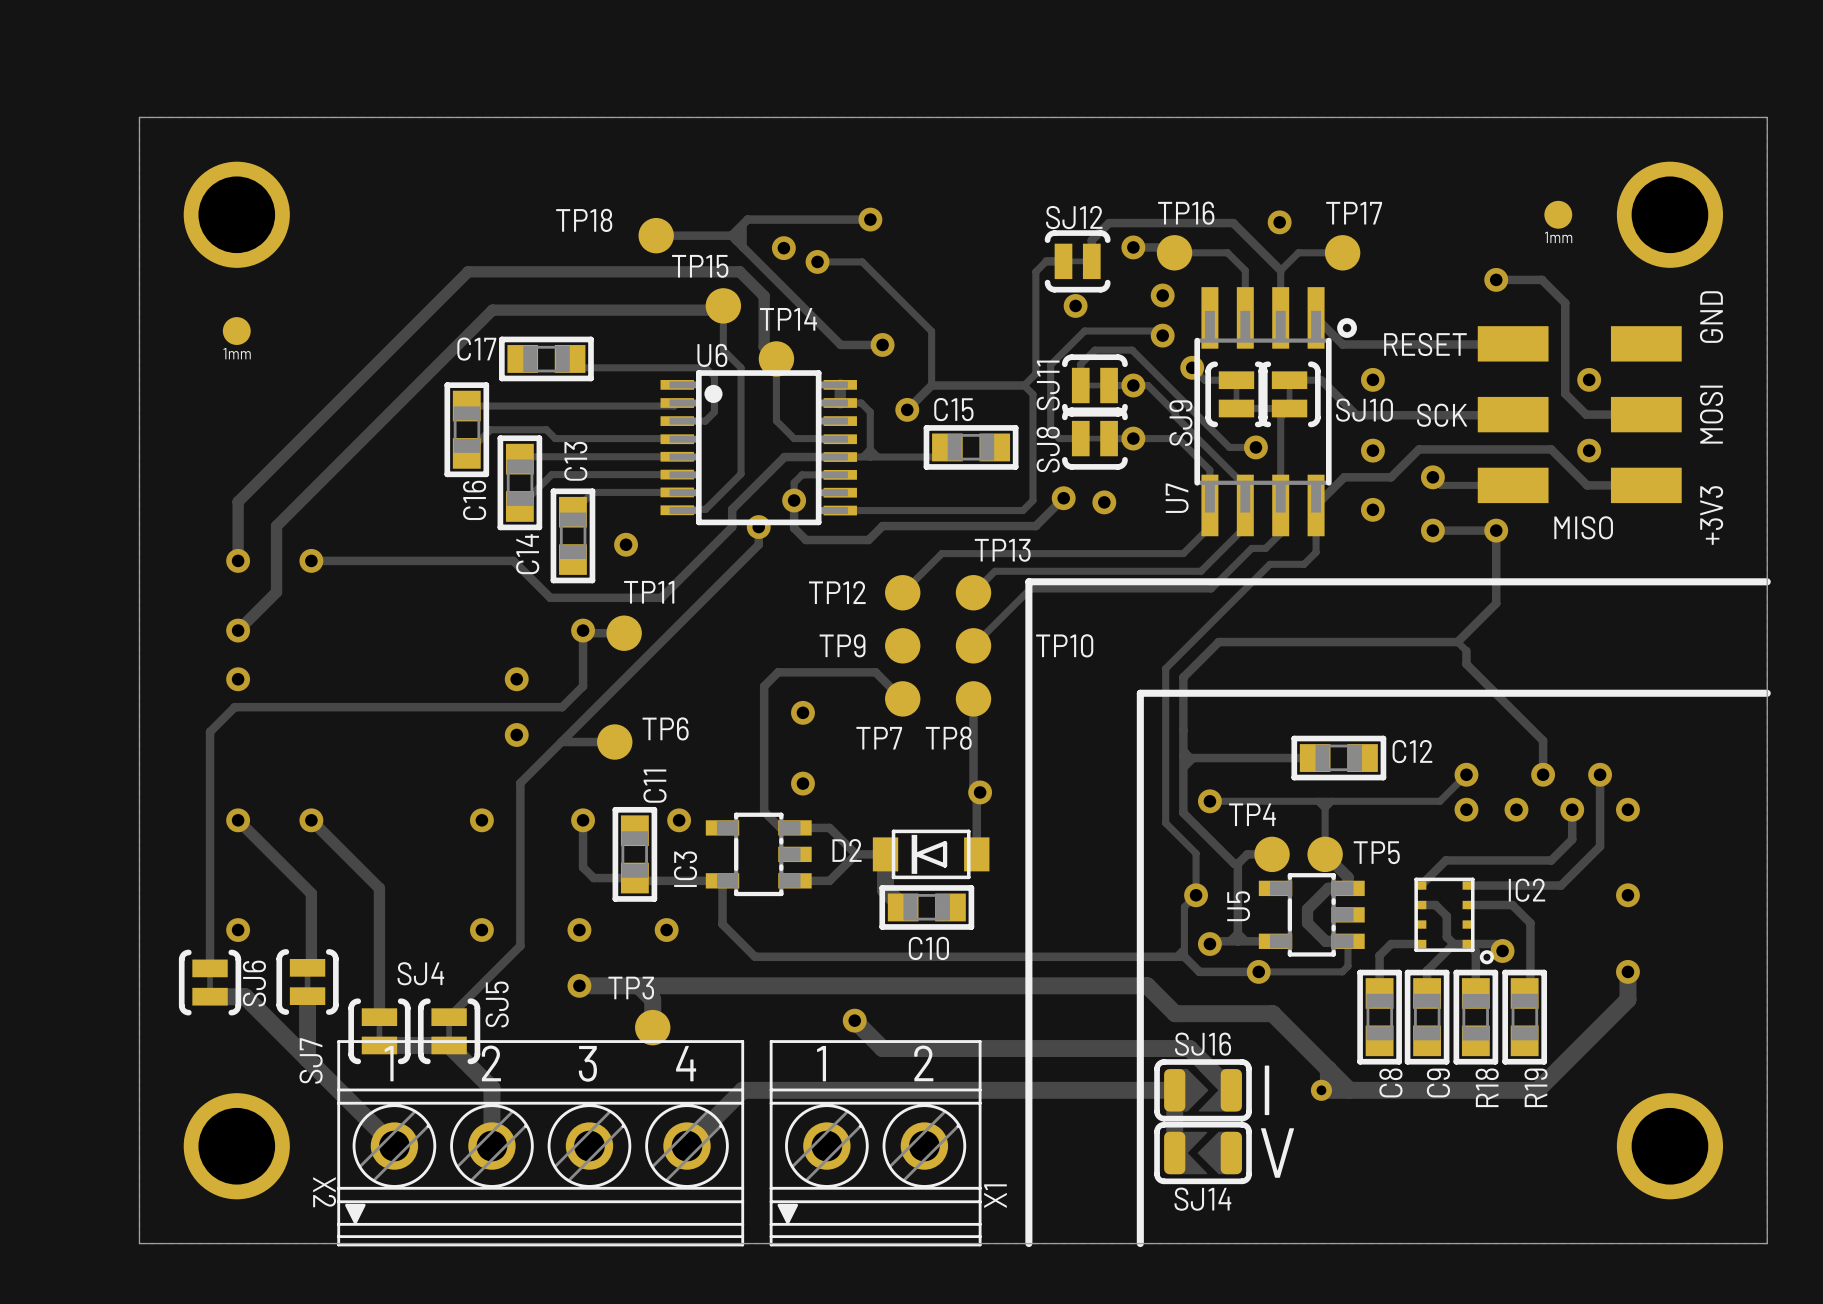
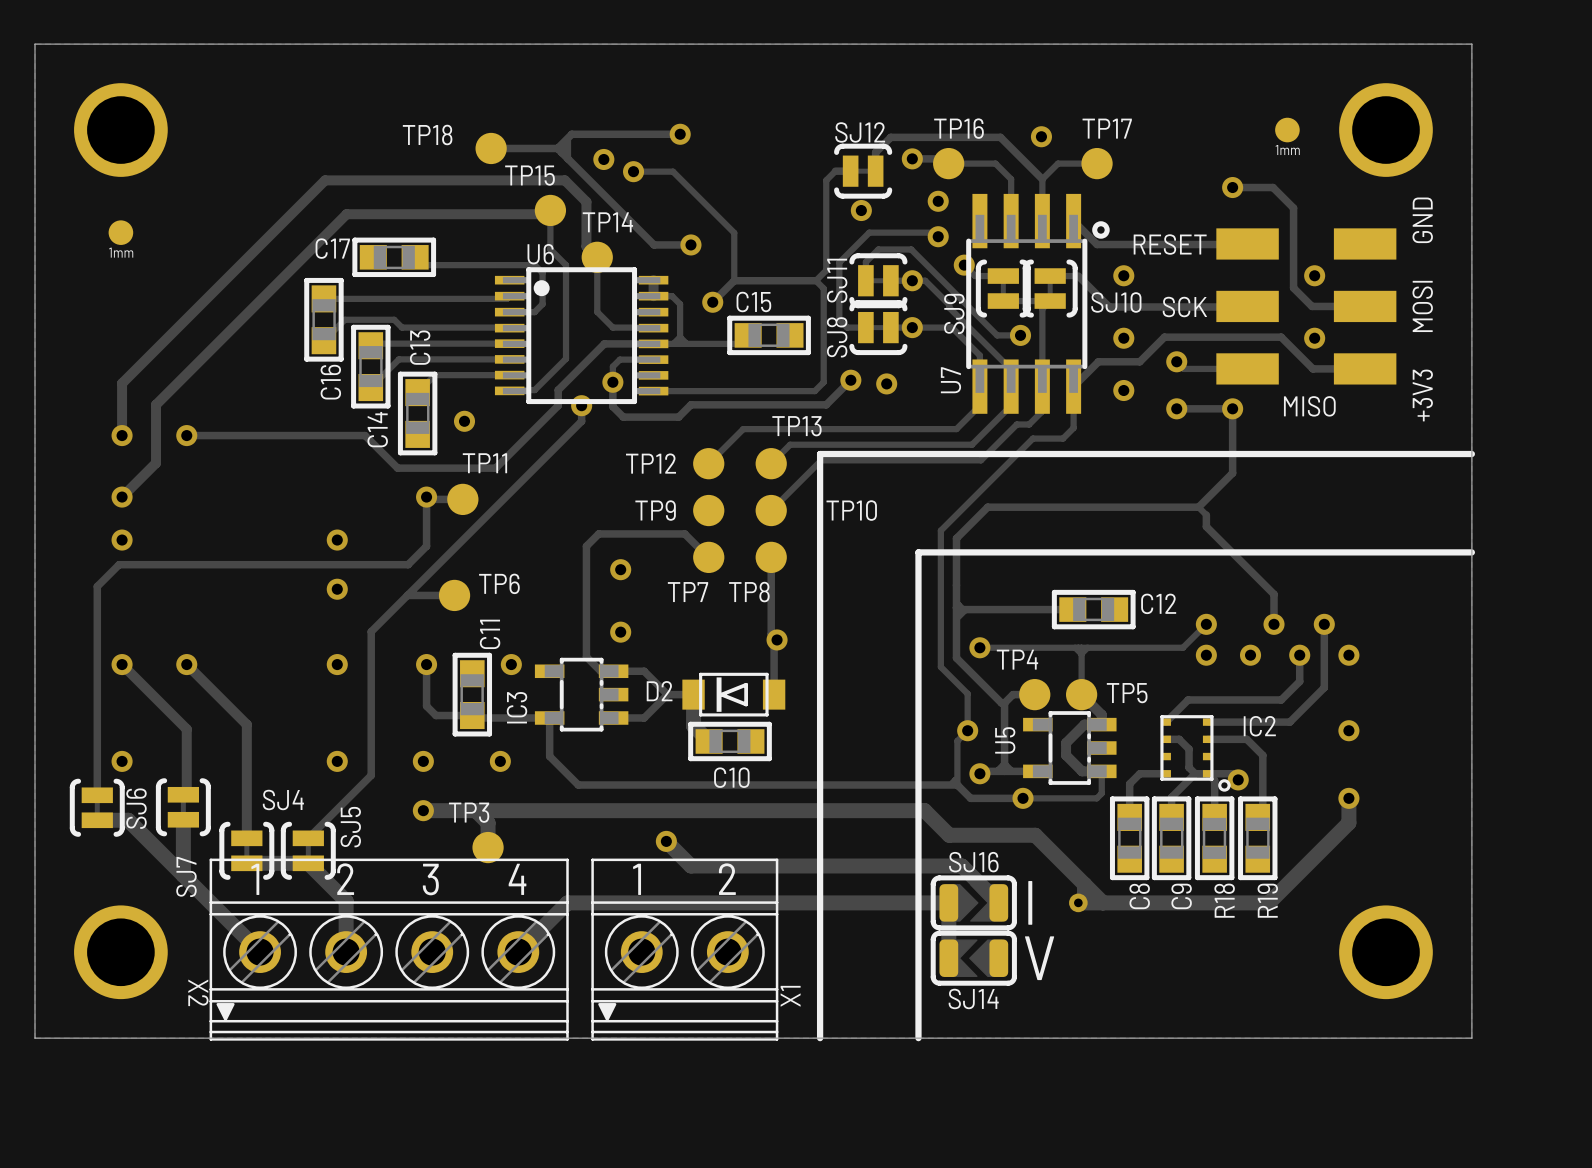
via: none -> (337, 540)
via: (516, 679) -> none
via: none -> (337, 589)
via: (516, 734) -> none

